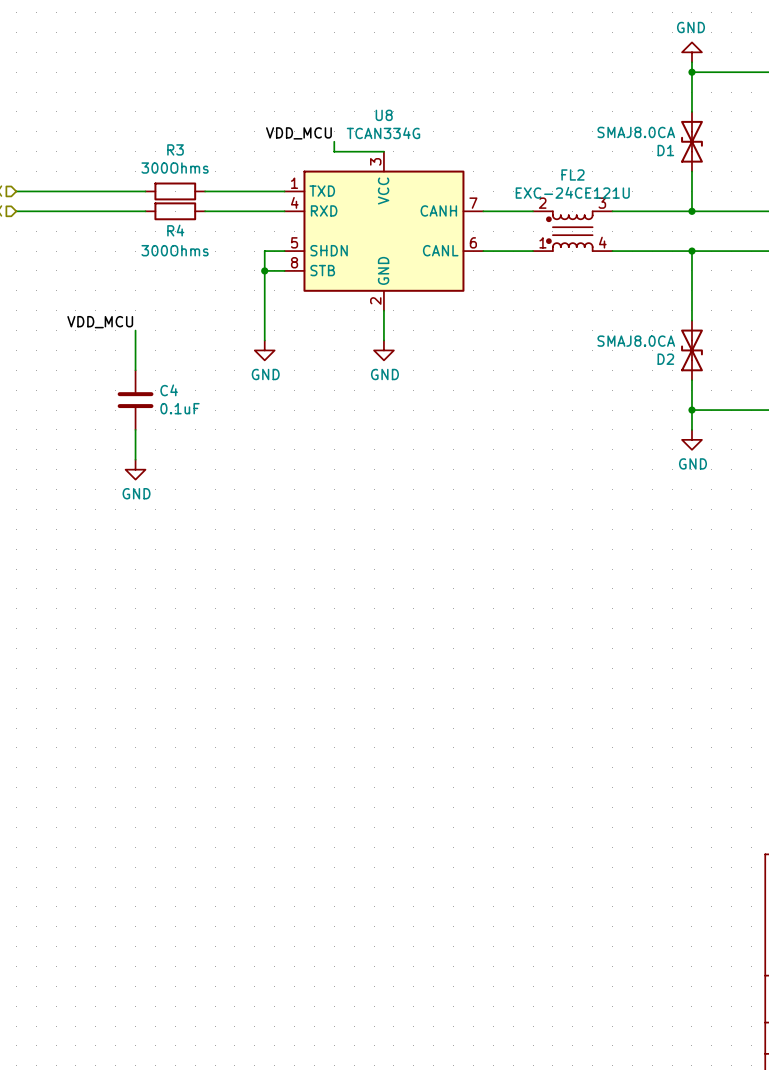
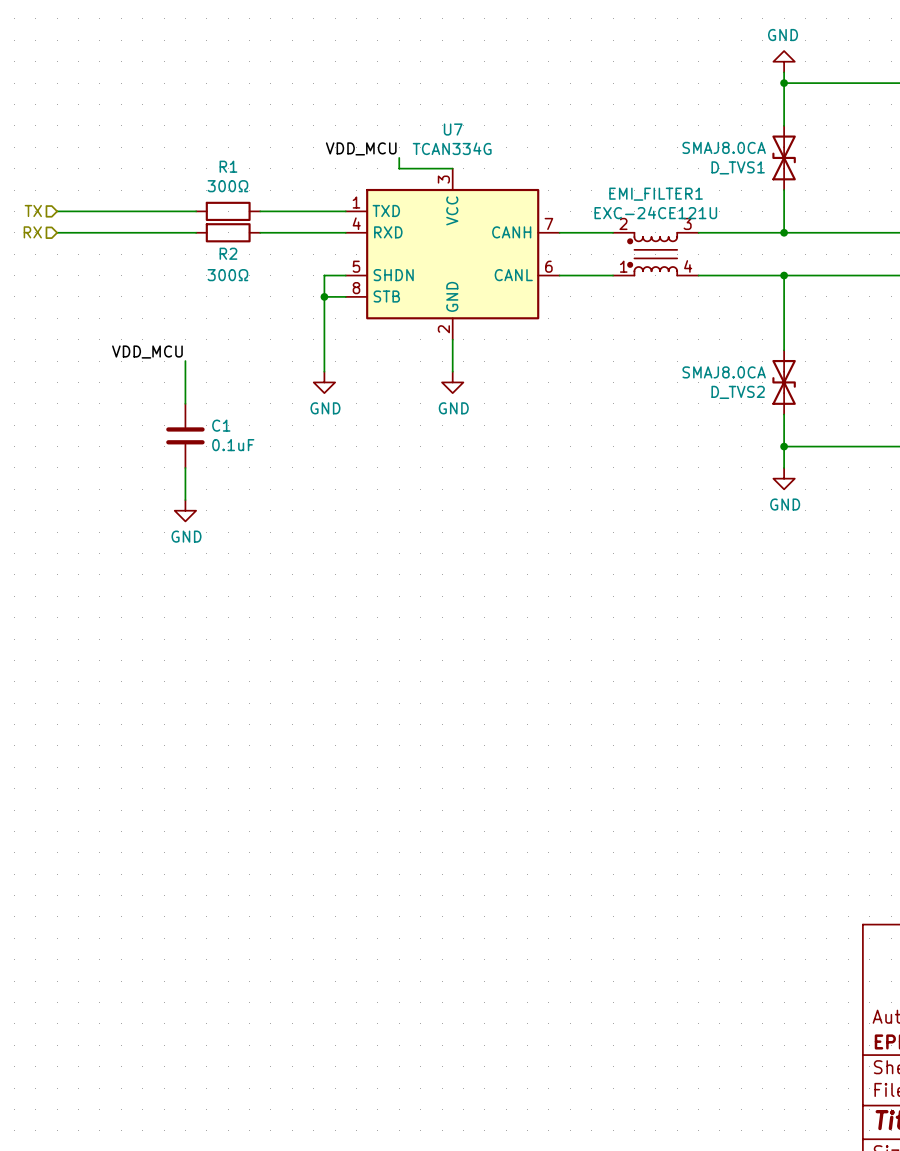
U8 name: U8 (384, 115) -> U7 (453, 129)
R3 name: R3 (175, 149) -> R1 (228, 166)
D1 name: D1 (665, 150) -> D_TVS1 (738, 167)
R3 value: 300Ohms (175, 168) -> 300Ω (227, 186)
FL2 name: FL2 (572, 174) -> EMI_FILTER1 (656, 194)
R4 name: R4 (175, 230) -> R2 (228, 253)
R4 value: 300Ohms (175, 250) -> 300Ω (227, 275)
D2 name: D2 (665, 359) -> D_TVS2 (738, 392)
C4 name: C4 (169, 390) -> C1 (221, 425)

